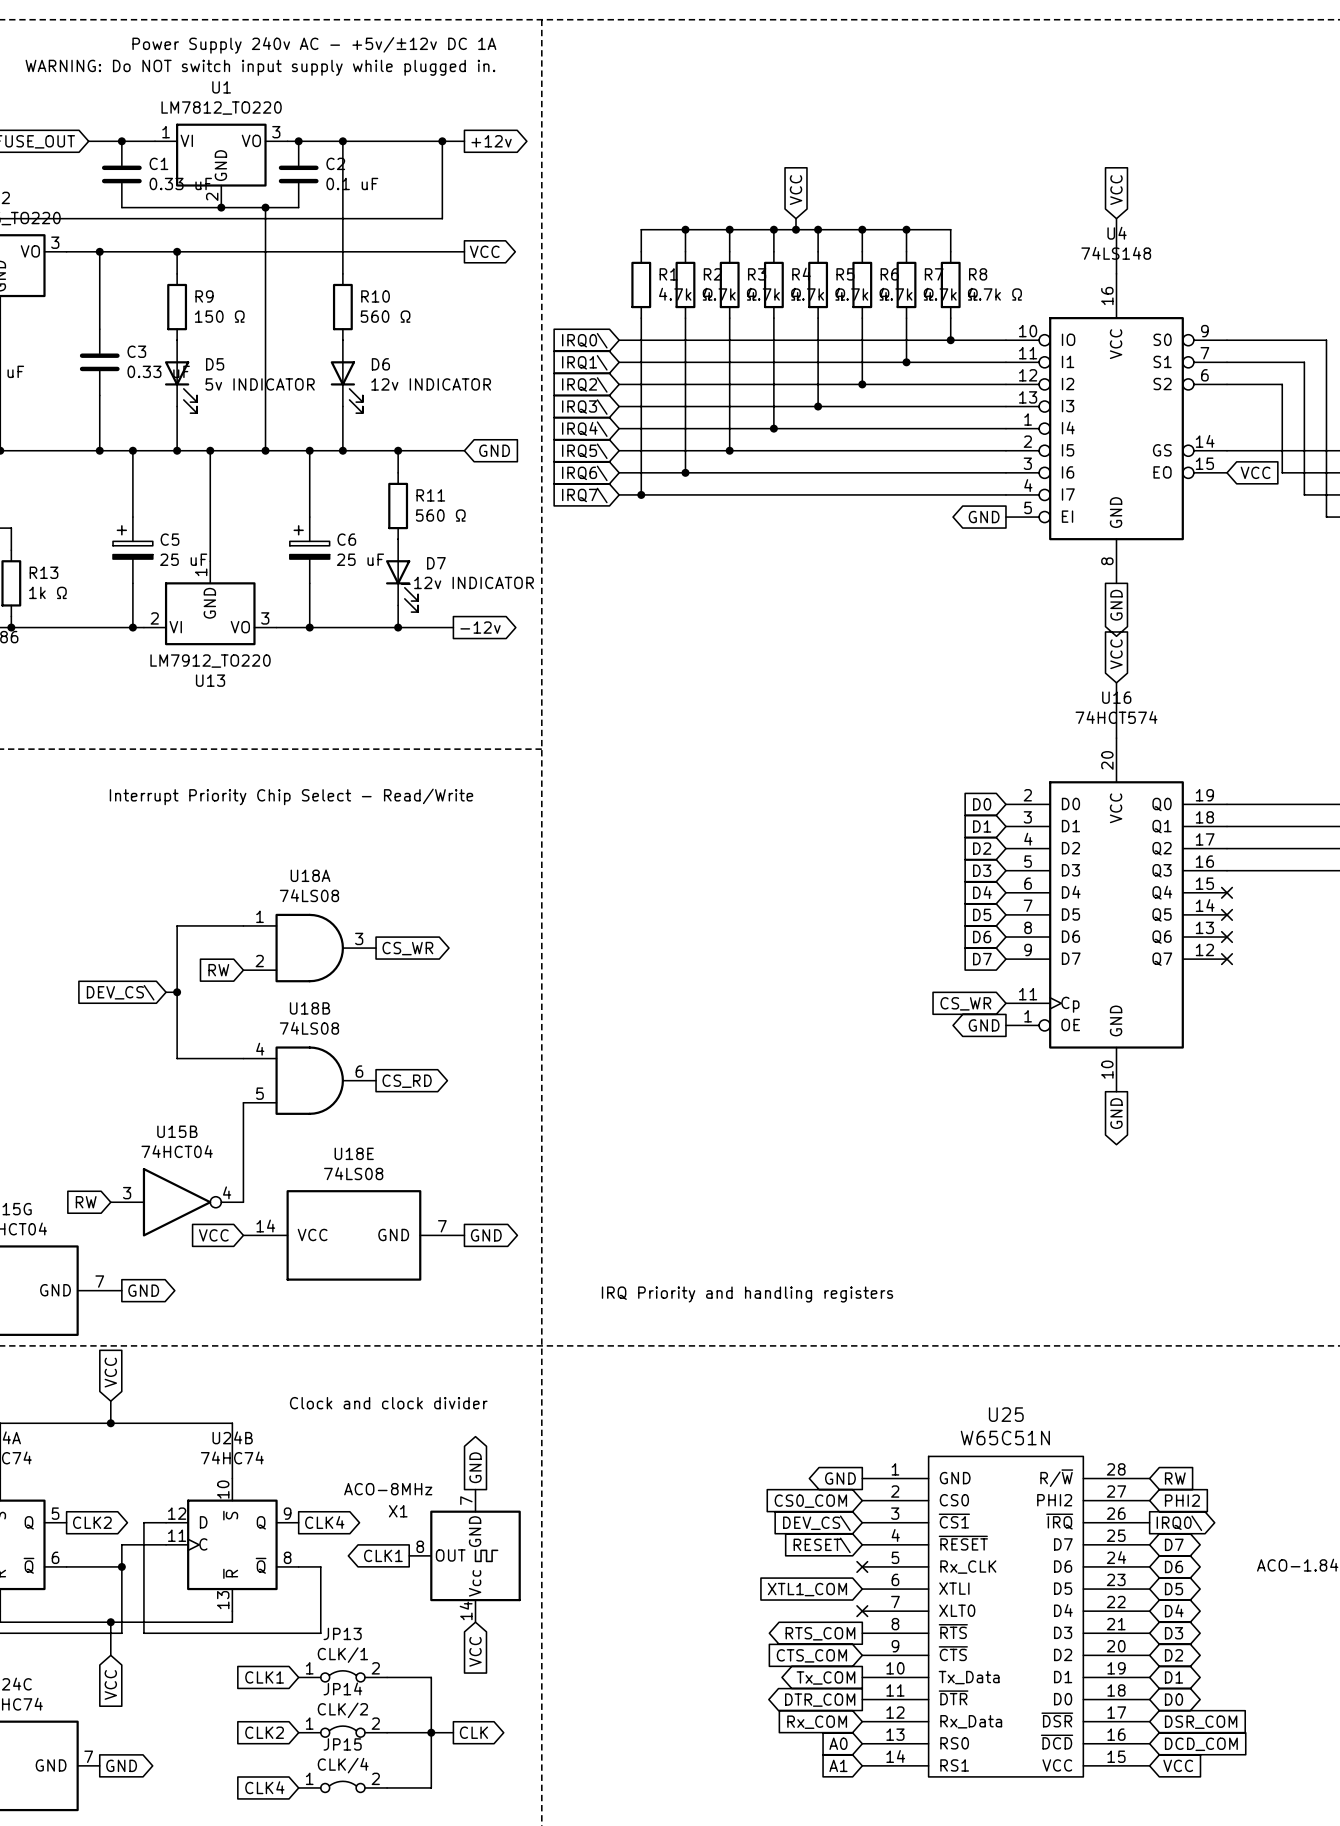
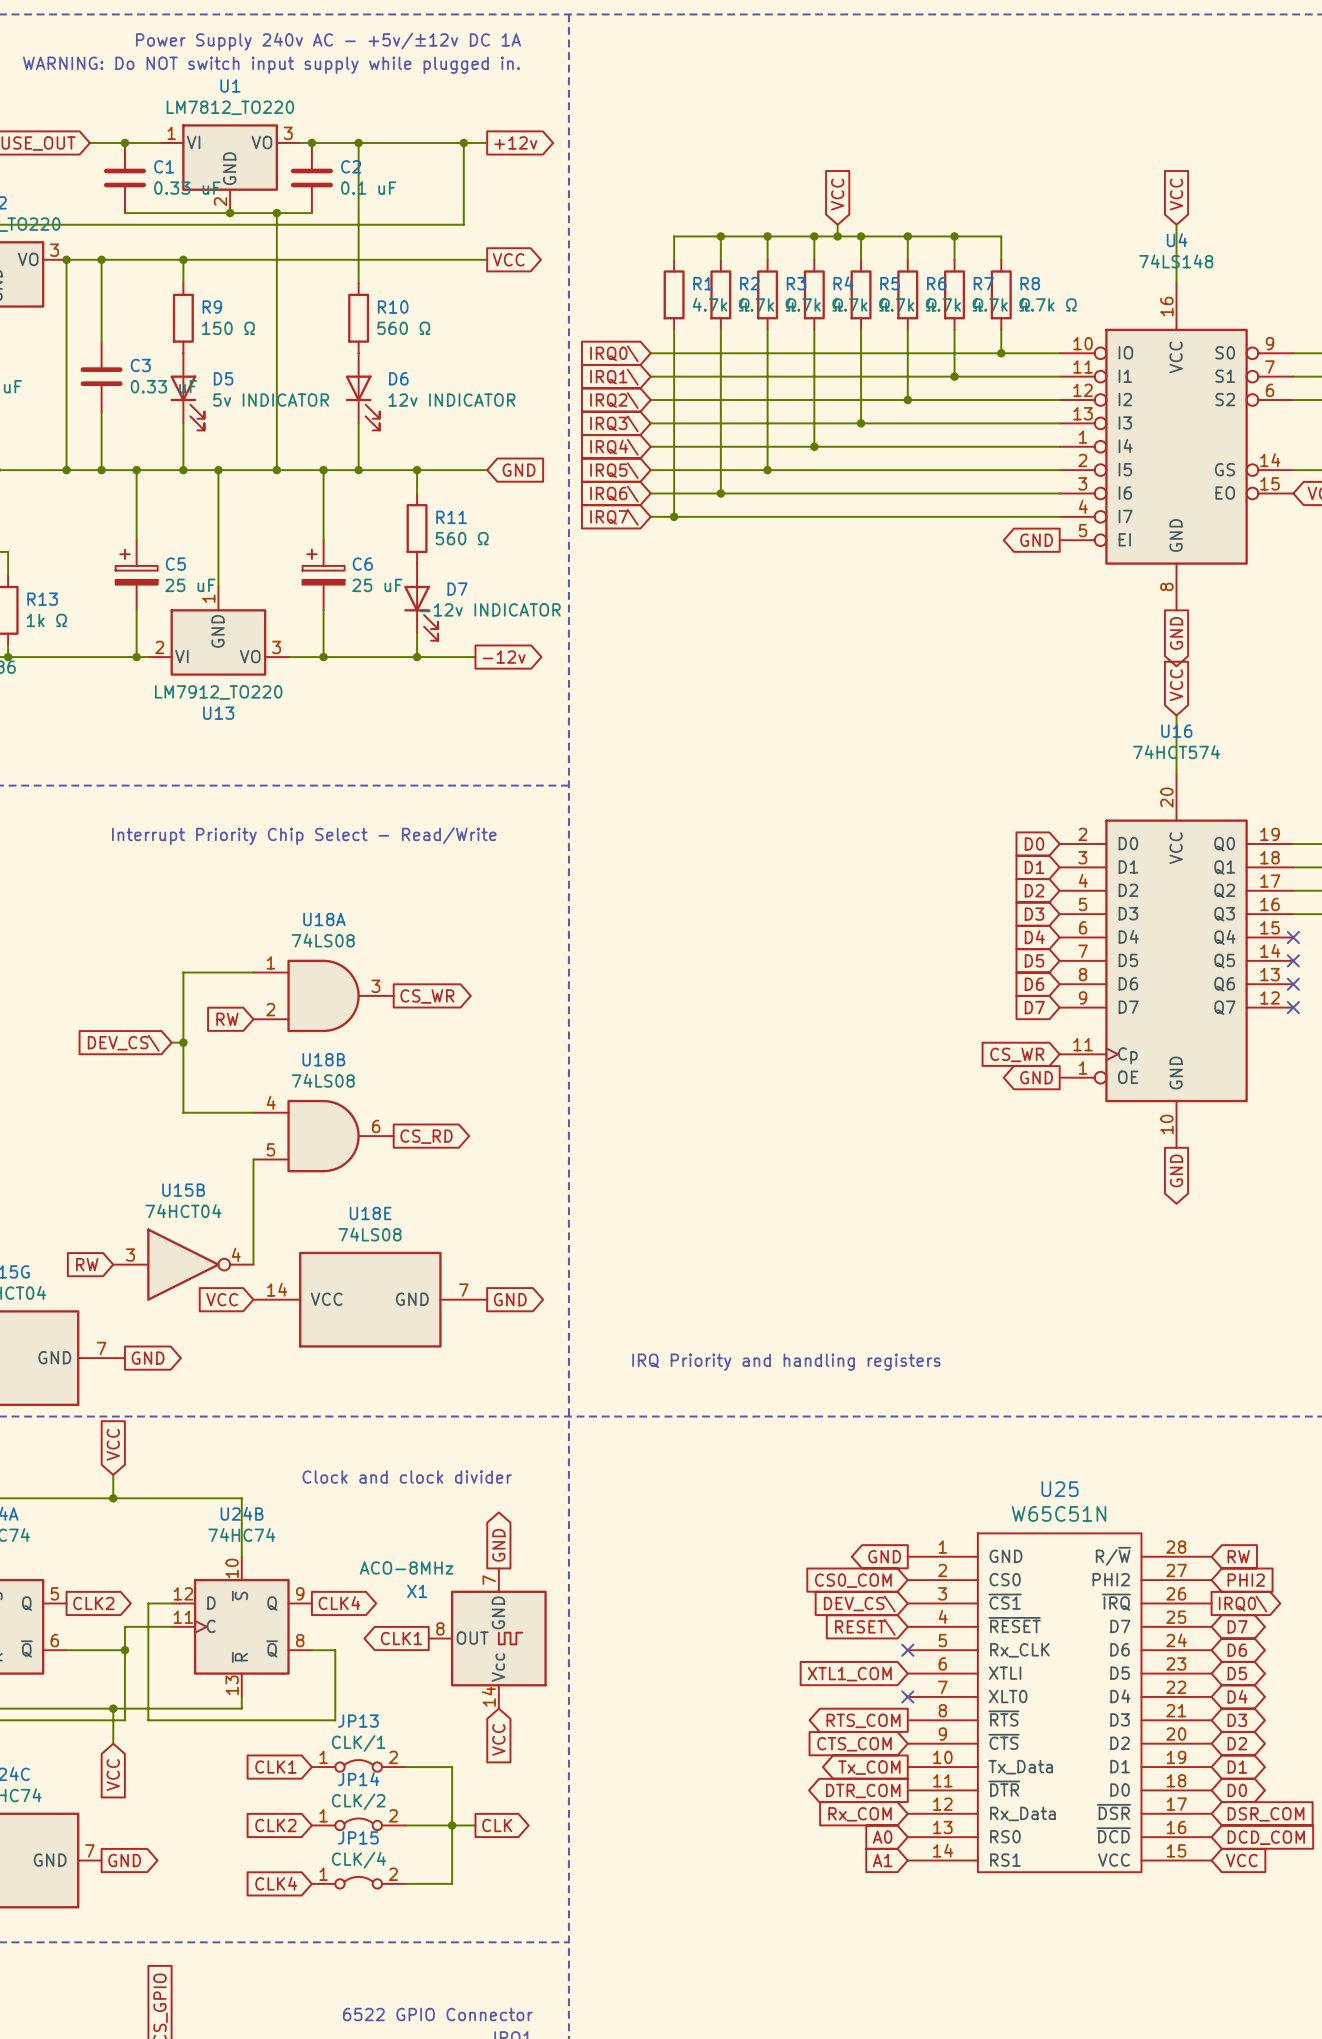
wire: none -> (66, 259) (66, 470)
junction: none -> (66, 259)
junction: none -> (66, 470)

